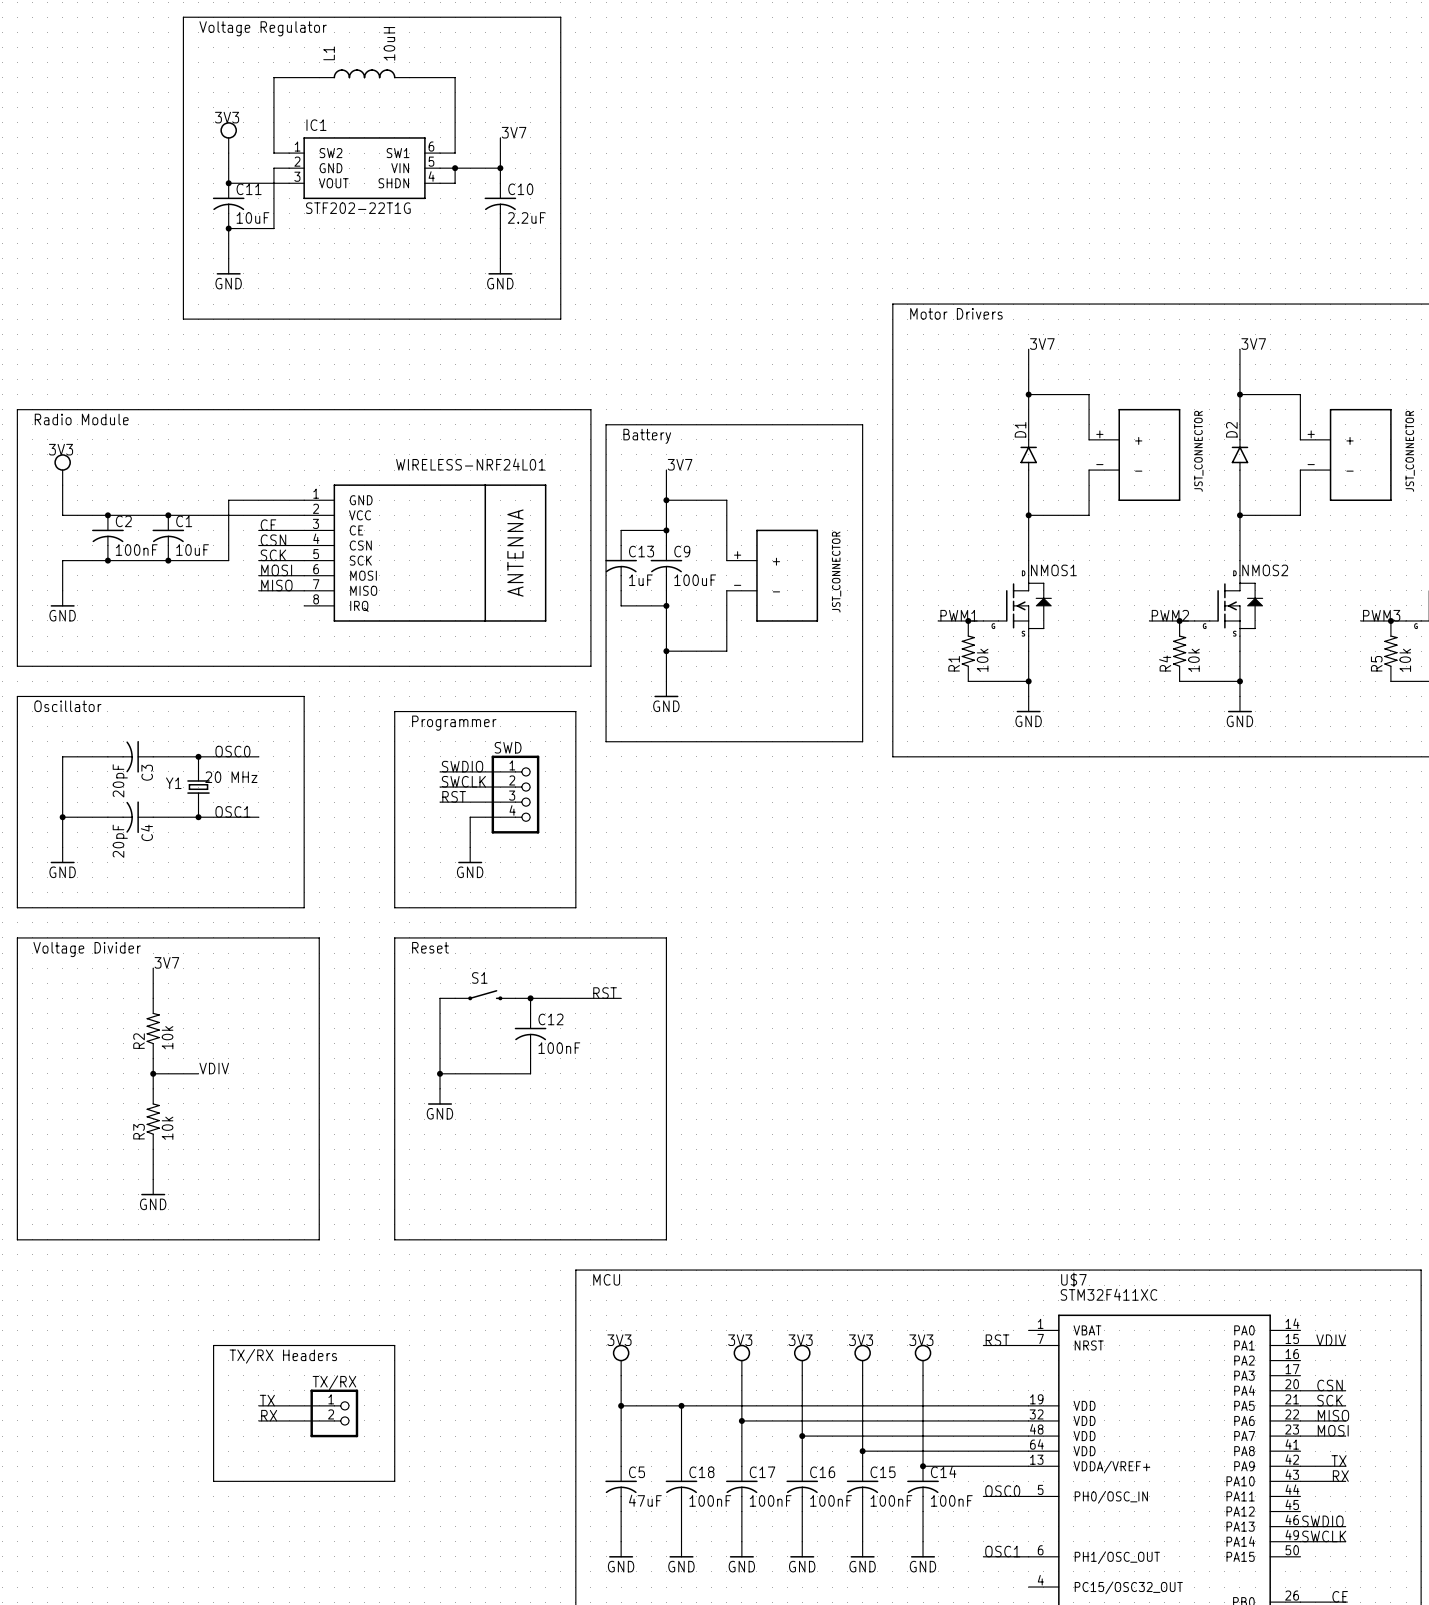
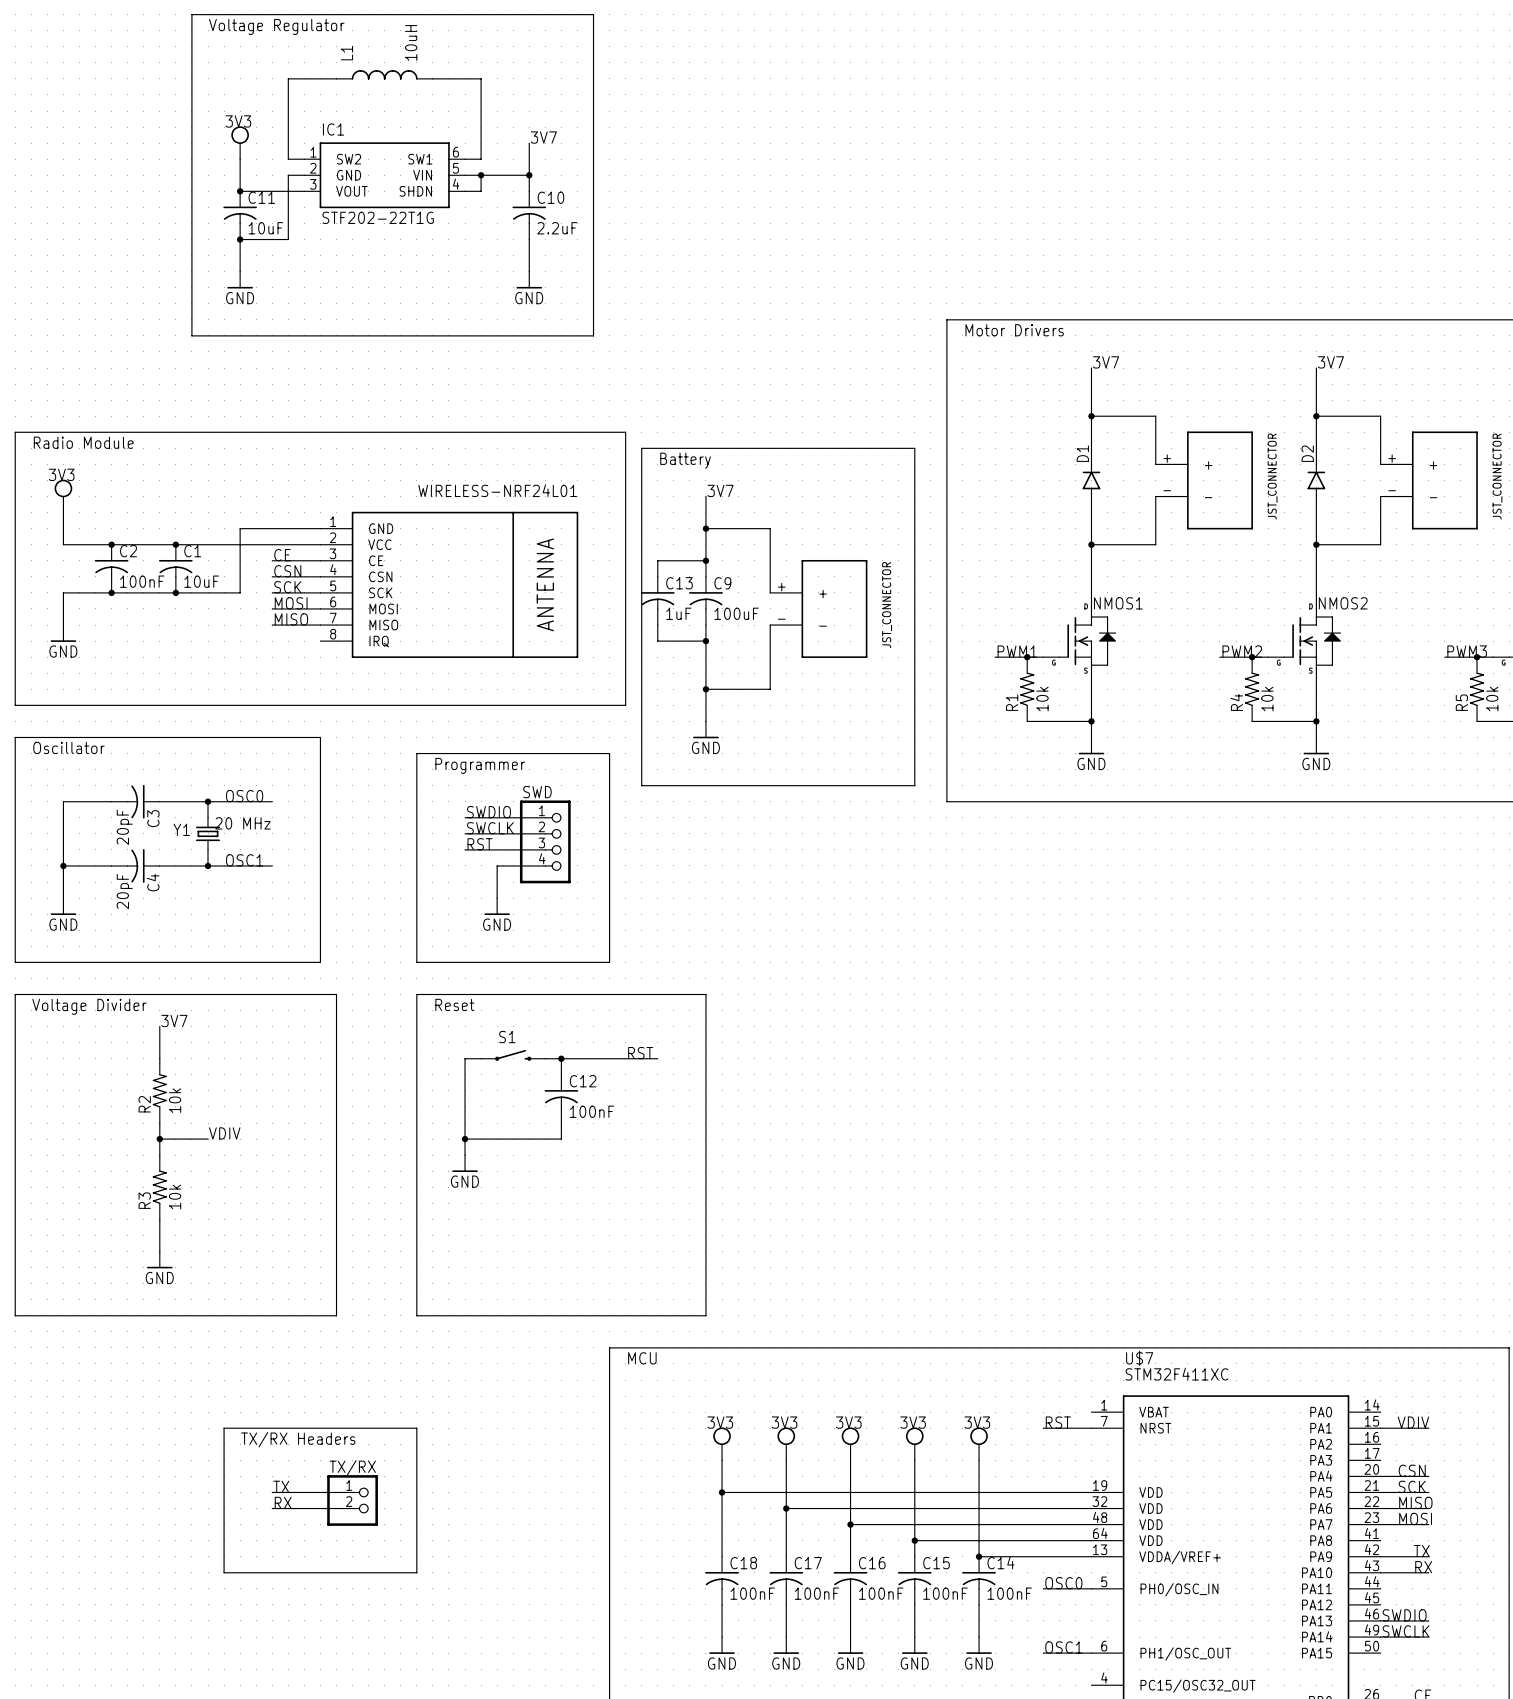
label position: 3V3 (619, 1340) -> 3V3 (720, 1422)
power symbol position: (621, 1360) -> (722, 1443)
wire: (621, 1375) (621, 1466) -> none
wire: (621, 1405) (681, 1405) -> (722, 1460) (722, 1492)
junction: (621, 1405) -> none
C5: 47uF (621, 1488) -> none
wire: (621, 1511) (621, 1541) -> none
power symbol: (621, 1549) -> none
label: GND (621, 1566) -> none

